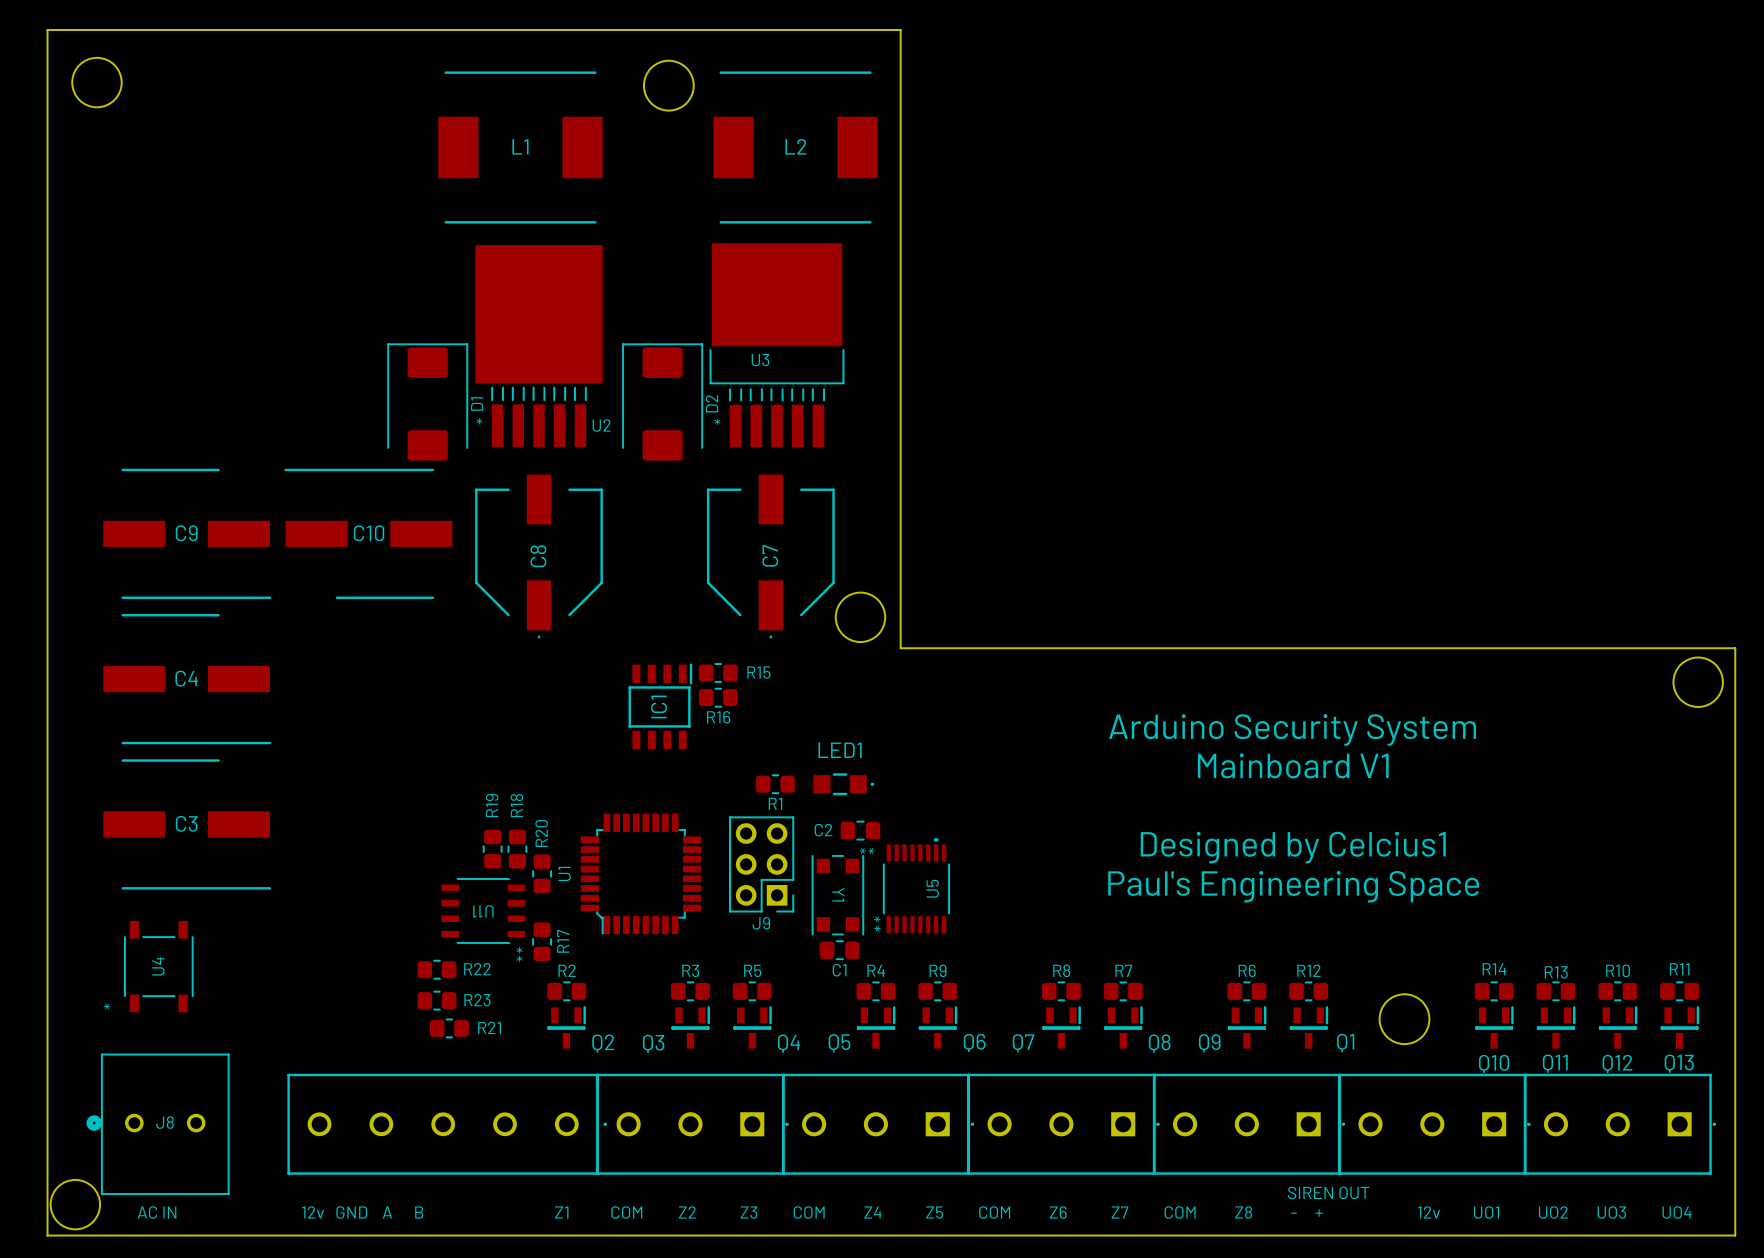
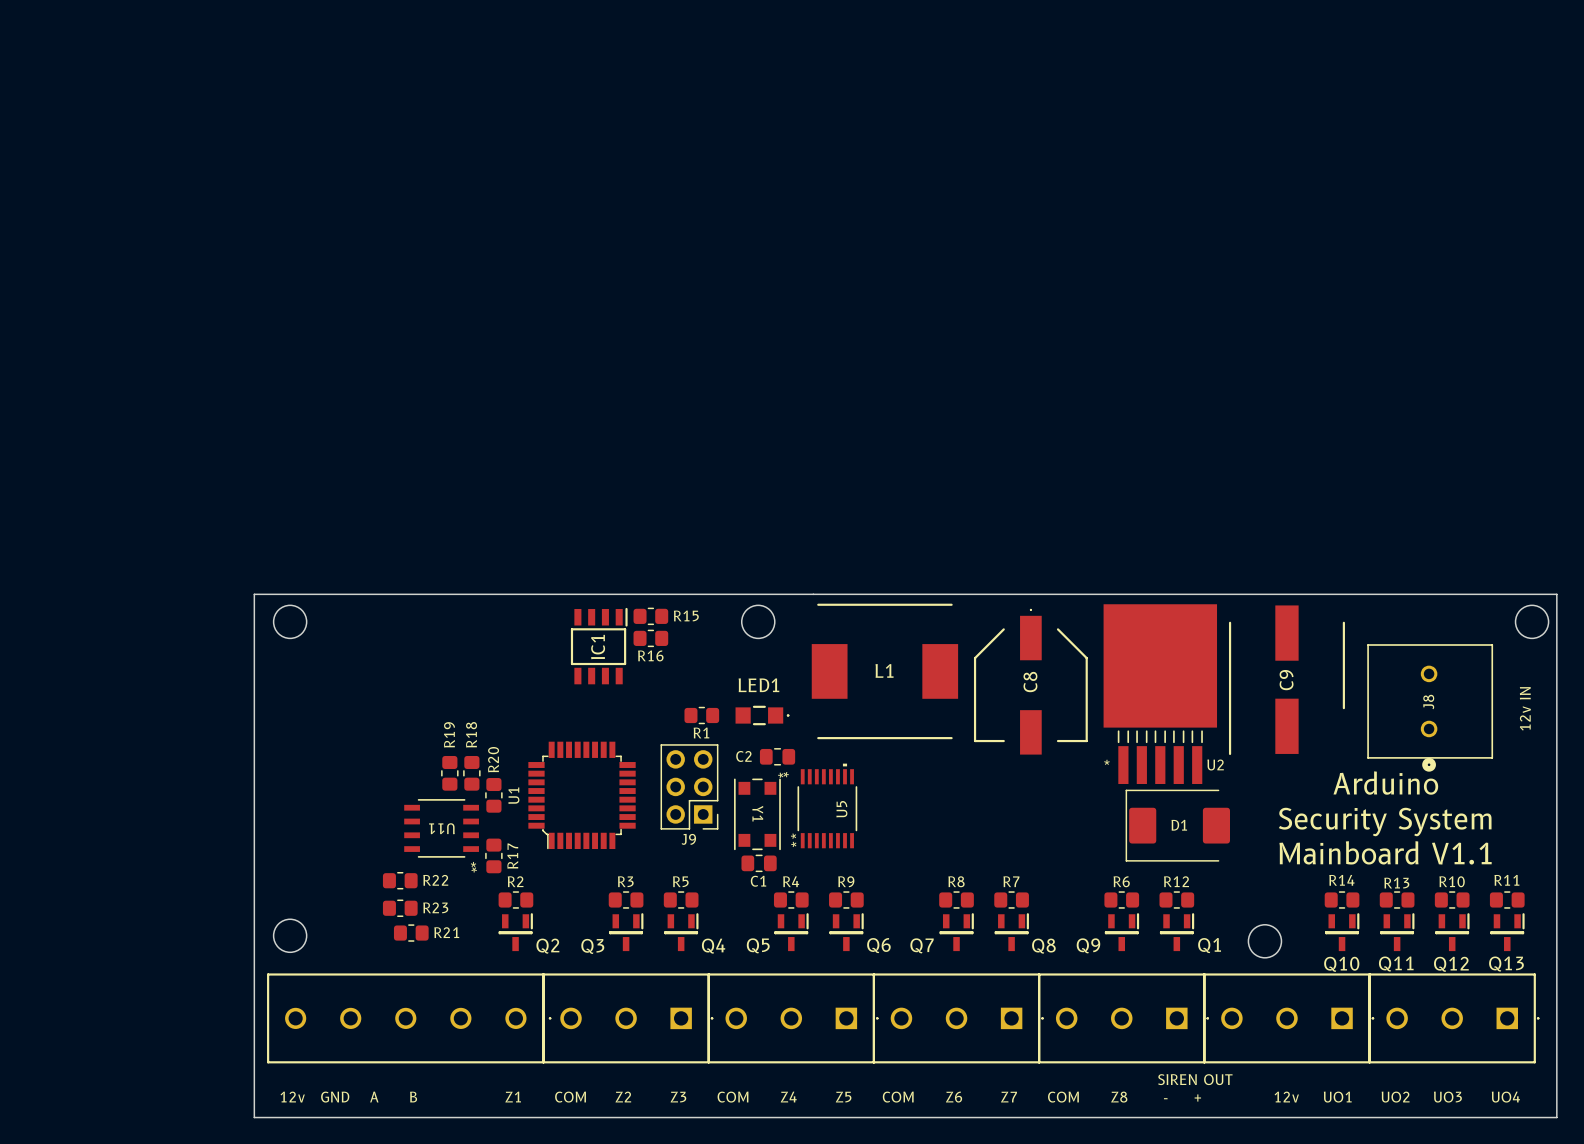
round board edge: [71, 57, 123, 108] -> none
round board edge: [643, 60, 695, 112] -> none
L1 position: (520, 147) -> (884, 671)
L2: (795, 147) -> none
U3: (777, 345) -> none
U2 position: (539, 346) -> (1160, 694)
D1 rotation: 0° (427, 402) -> 90° counterclockwise (1177, 825)
D1 position: (427, 402) -> (1177, 825)
D2: (662, 402) -> none
D1 name position: D1 (477, 404) -> D1 (1179, 825)
C9 rotation: 0° (187, 533) -> 90° clockwise (1286, 680)
C9 position: (187, 533) -> (1286, 680)
C10: (368, 533) -> none
C8 rotation: 0° (539, 556) -> 180° (1030, 681)
C8 position: (539, 556) -> (1030, 681)
C7: (770, 556) -> none
round board edge: [835, 591, 886, 643] -> none
board edge: (900, 648) (900, 30) (47, 30) (47, 1235) (273, 1235) -> (813, 594) (254, 594) (254, 1117)
round board edge size: [1672, 656, 1724, 708] -> [1514, 604, 1550, 639]
round board edge: none -> [273, 604, 308, 639]
round board edge: none -> [741, 604, 776, 639]
C4: (187, 679) -> none
text: Arduino Security System (1292, 730) -> none
text: Mainboard V1 (1293, 765) -> none
text: none -> 12v IN (1525, 708)
C3: (187, 824) -> none
text: Designed by Celcius1 (1293, 847) -> none
text: none -> Arduino (1385, 783)
text: Paul's Engineering Space (1293, 886) -> none
text: none -> Security System (1385, 821)
text: none -> Mainboard V1.1 (1385, 852)
U4: (158, 966) -> none
round board edge: [1378, 993, 1431, 1045] -> none
round board edge: none -> [273, 918, 308, 953]
round board edge: none -> [1247, 924, 1283, 959]
J8 rotation: 0° (158, 1124) -> 90° counterclockwise (1430, 707)
J8 position: (158, 1124) -> (1430, 707)
round board edge: [50, 1179, 101, 1230] -> none
text: AC IN (157, 1212) -> none

